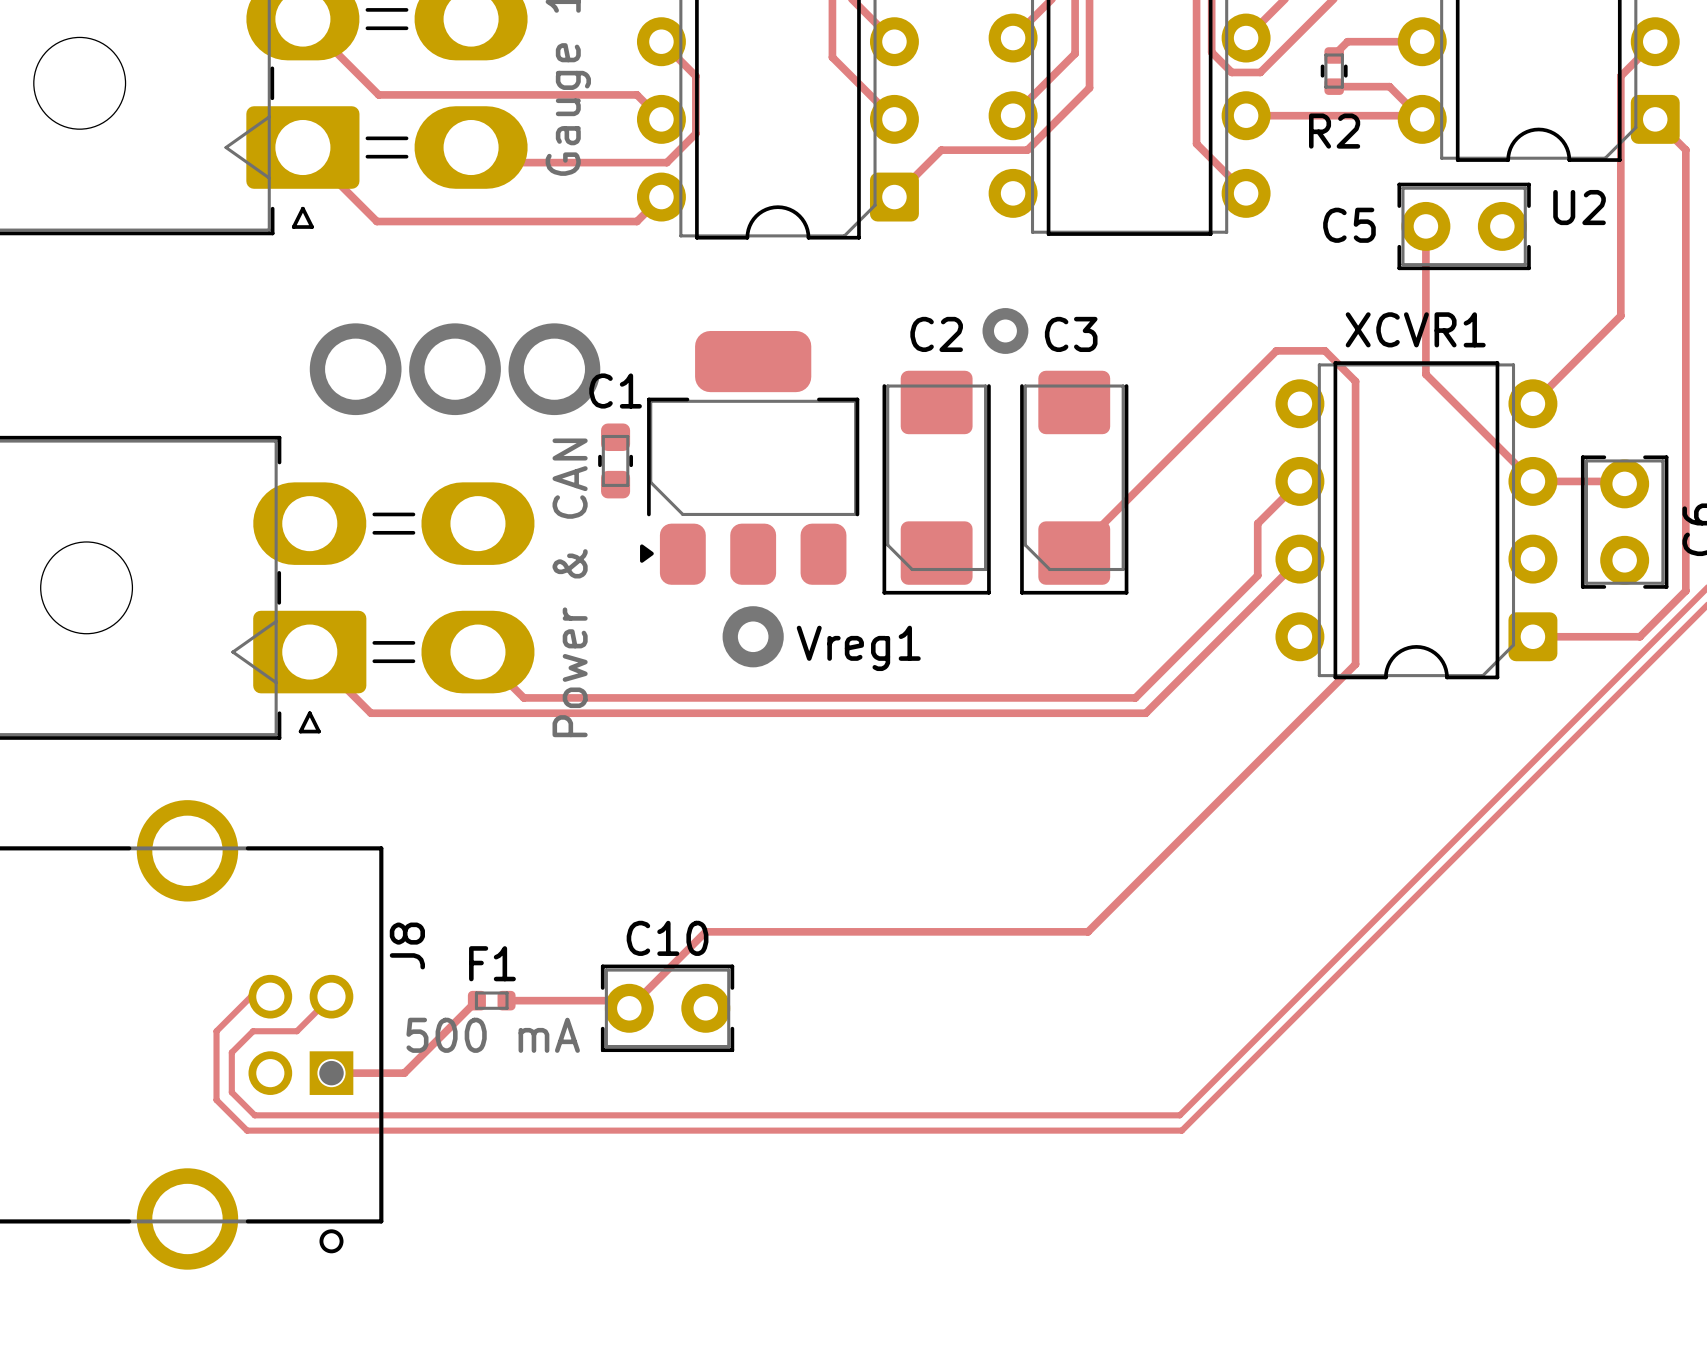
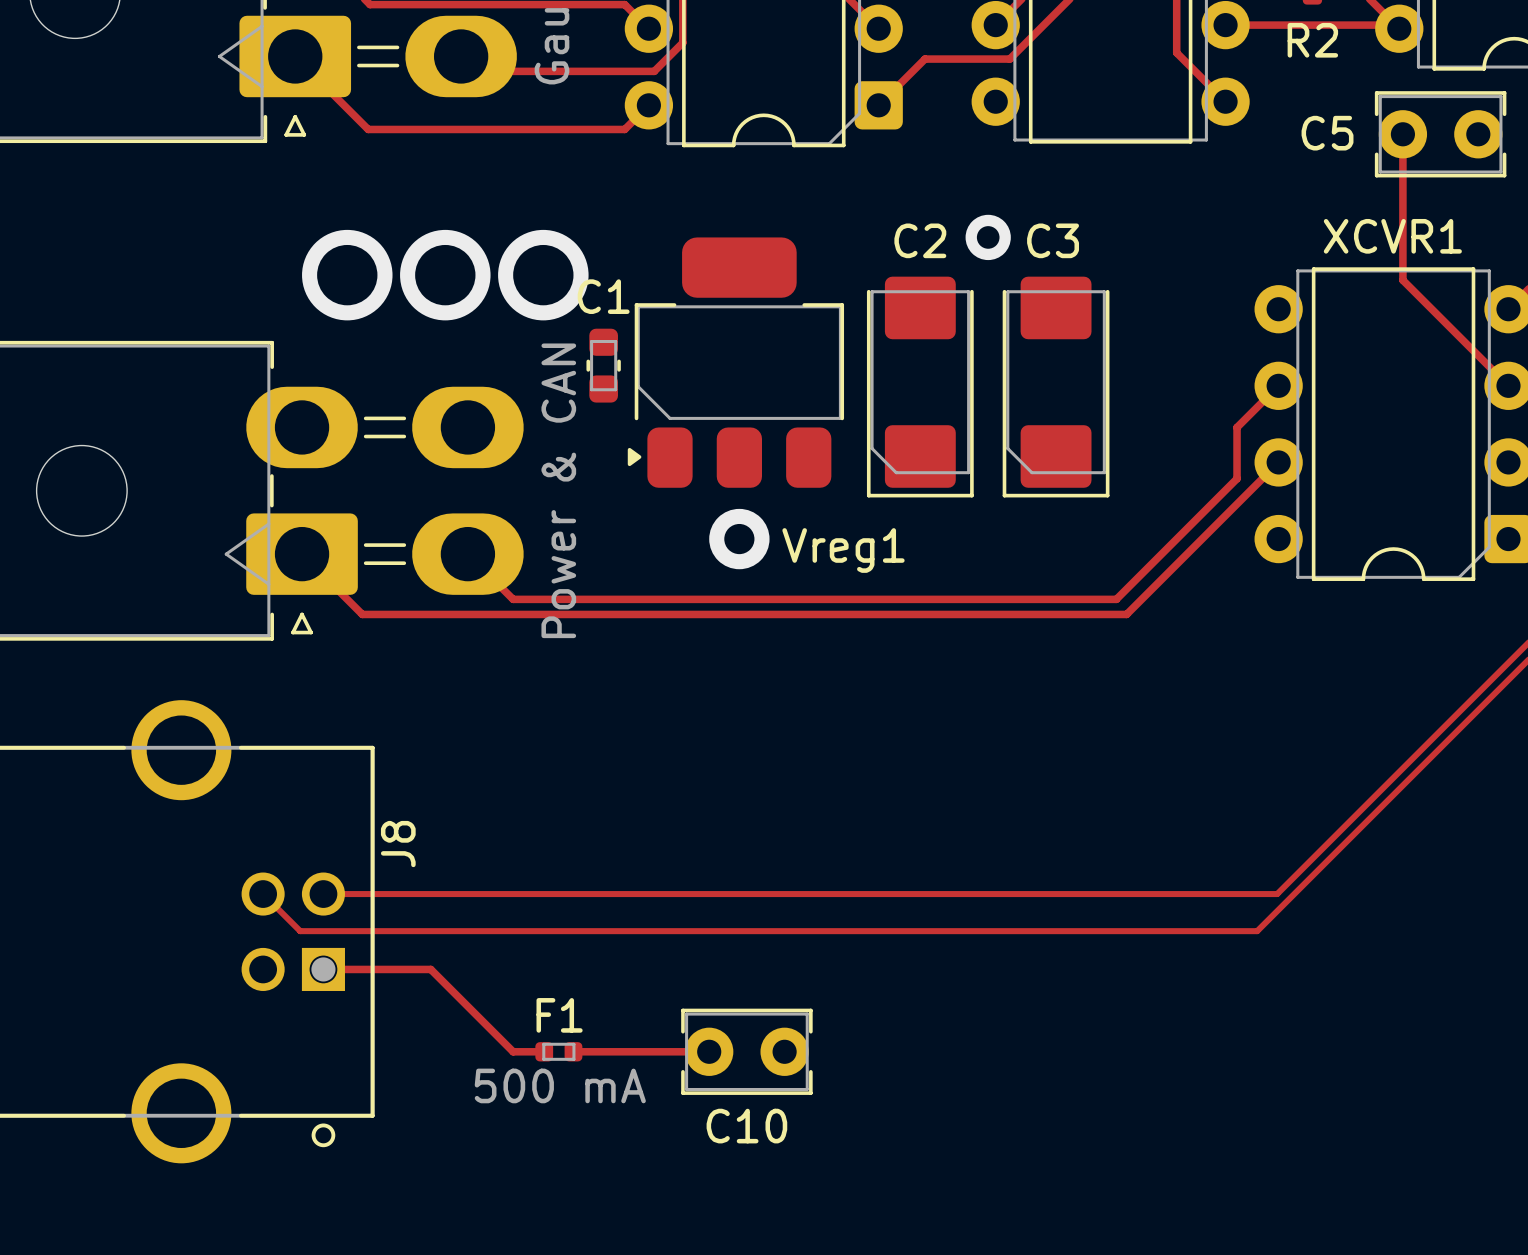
track: (1074, 553) (1276, 350) (1324, 350) (1355, 381) (1355, 664) (1088, 931) (705, 931) (629, 1008) (621, 1000) (506, 1000) -> none
C10 name position: C10 (667, 938) -> C10 (746, 1126)
track: (270, 996) (251, 996) (216, 1031) (216, 1100) (247, 1130) (1181, 1130) (1278, 1034) -> (263, 894) (300, 931) (1257, 931)
track: (331, 996) (296, 1031) (253, 1031) (231, 1052) (231, 1092) (254, 1115) (1179, 1115) (1298, 996) -> (323, 894) (1277, 894)
track: (476, 1000) (404, 1073) -> (544, 1051) (513, 1051) (430, 969) (395, 969)
F1 position: (491, 1000) -> (558, 1051)
C10 position: (667, 1008) -> (746, 1051)
track: none -> (573, 1051) (709, 1051)

